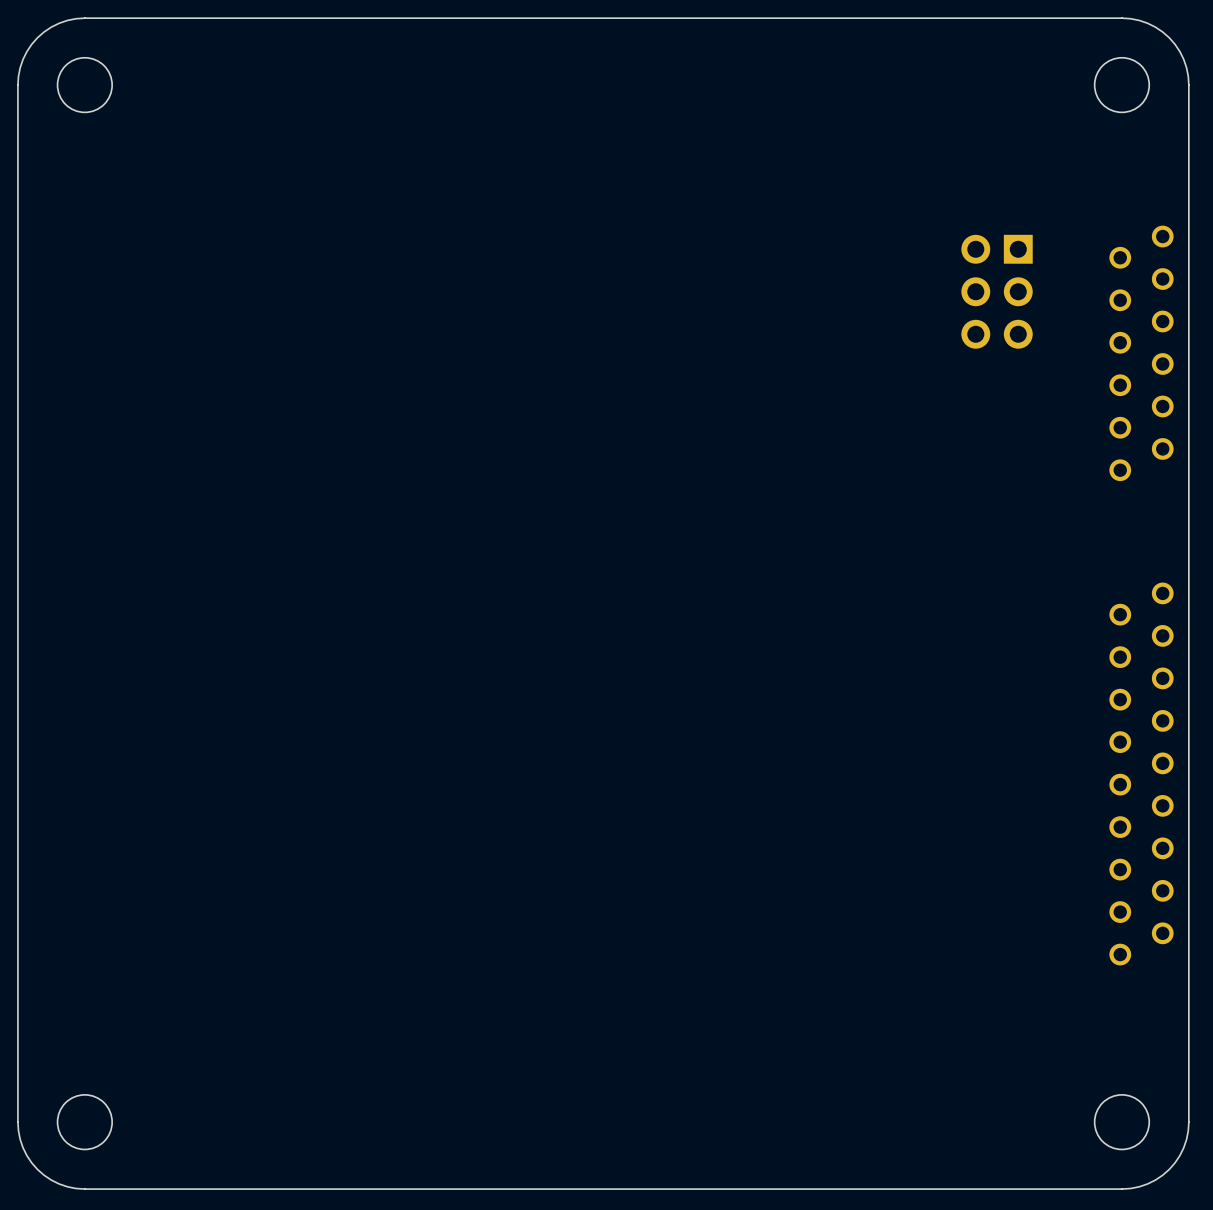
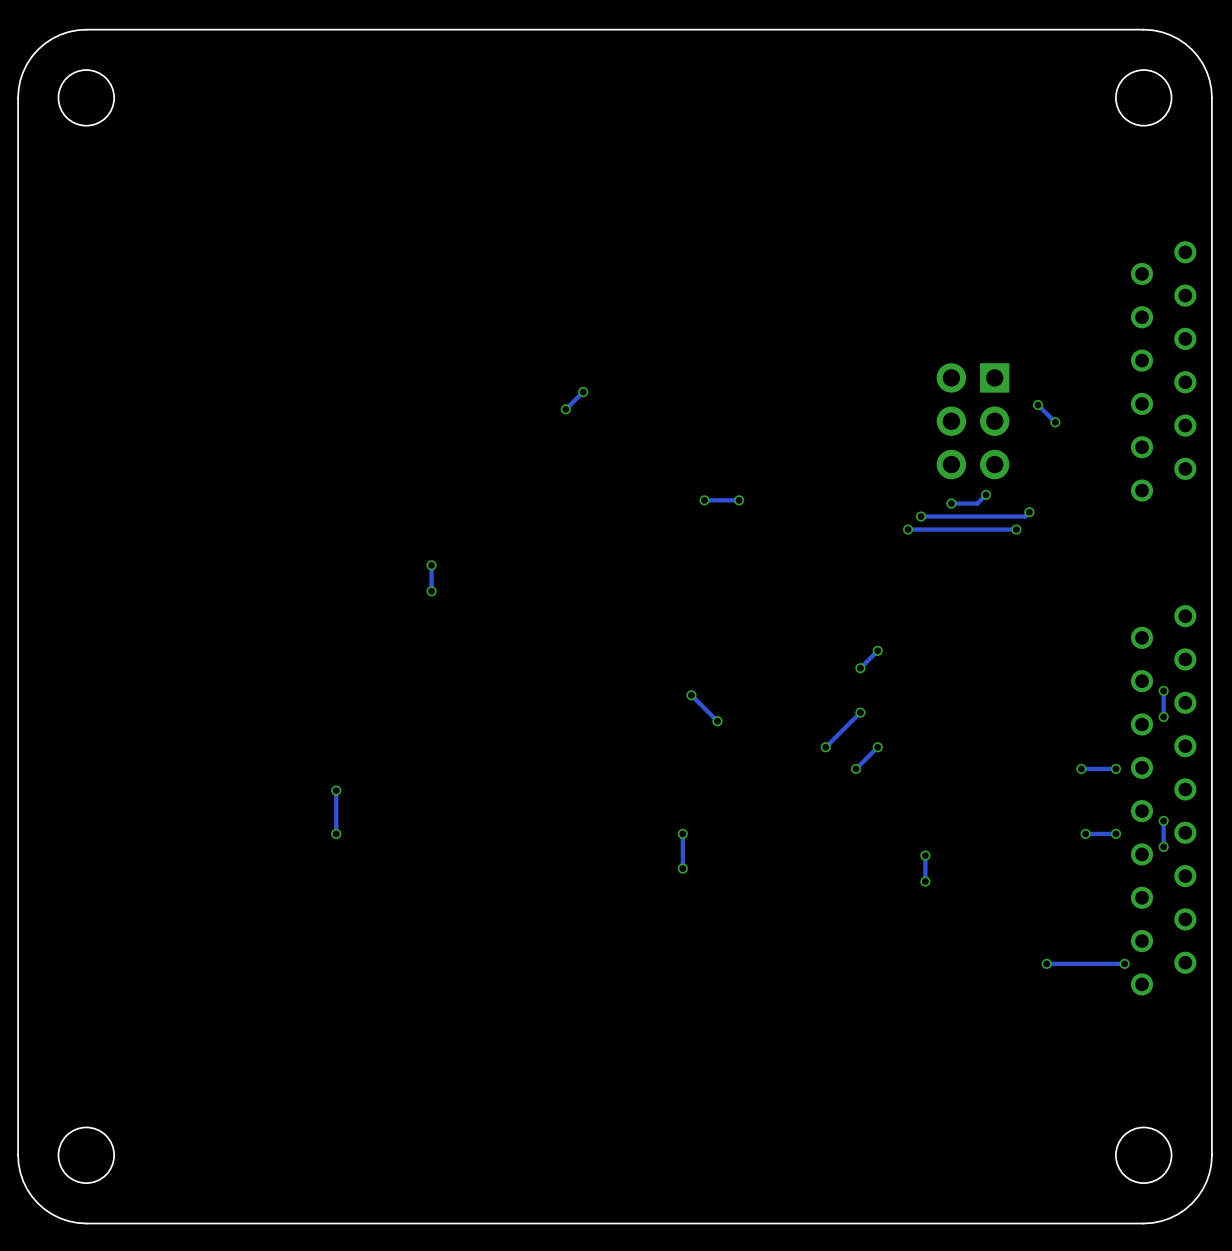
part position: (997, 291) -> (973, 421)
track: none -> (583, 392) (565, 409)
via: none -> (583, 392)
track: none -> (1038, 405) (1055, 422)
via: none -> (1038, 405)
via: none -> (565, 409)
via: none -> (1055, 422)
track: none -> (986, 494) (977, 503) (951, 503)
via: none -> (986, 494)
via: none -> (704, 500)
track: none -> (739, 500) (704, 500)
via: none -> (739, 500)
via: none -> (951, 503)
track: none -> (1029, 512) (1025, 516) (921, 516)
via: none -> (1029, 512)
via: none -> (921, 516)
via: none -> (908, 529)
track: none -> (1016, 529) (908, 529)
via: none -> (1016, 529)
track: none -> (431, 565) (431, 591)
via: none -> (431, 565)
via: none -> (431, 591)
track: none -> (877, 650) (860, 668)
via: none -> (877, 650)
via: none -> (860, 668)
track: none -> (1163, 690) (1163, 716)
via: none -> (1163, 690)
track: none -> (691, 695) (717, 721)
via: none -> (691, 695)
track: none -> (860, 712) (825, 747)
via: none -> (860, 712)
via: none -> (1163, 716)
via: none -> (717, 721)
via: none -> (825, 747)
track: none -> (877, 747) (856, 768)
via: none -> (877, 747)
via: none -> (856, 768)
via: none -> (1081, 768)
track: none -> (1116, 768) (1081, 768)
via: none -> (1116, 768)
track: none -> (336, 790) (336, 833)
via: none -> (336, 790)
track: none -> (1163, 820) (1163, 846)
via: none -> (1163, 820)
via: none -> (336, 833)
track: none -> (682, 833) (682, 868)
via: none -> (682, 833)
via: none -> (1085, 833)
track: none -> (1116, 833) (1085, 833)
via: none -> (1116, 833)
via: none -> (1163, 846)
track: none -> (925, 855) (925, 881)
via: none -> (925, 855)
via: none -> (682, 868)
via: none -> (925, 881)
via: none -> (1046, 963)
track: none -> (1124, 963) (1046, 963)
via: none -> (1124, 963)

